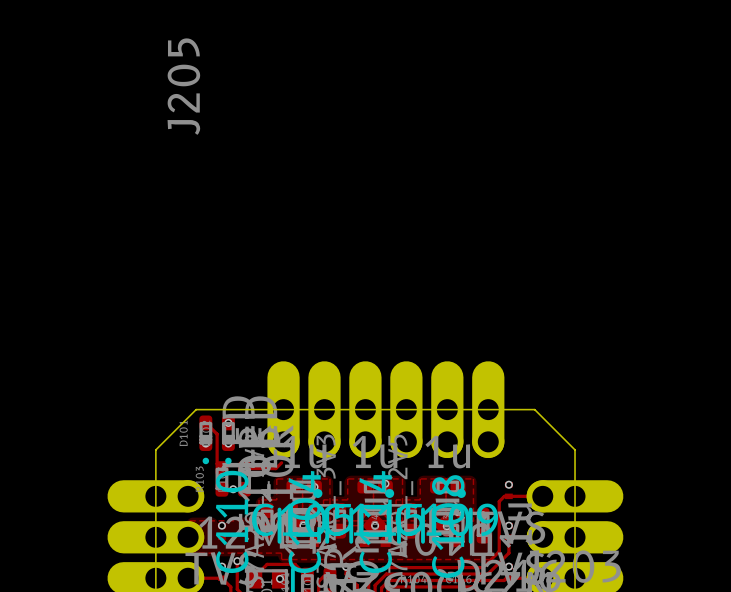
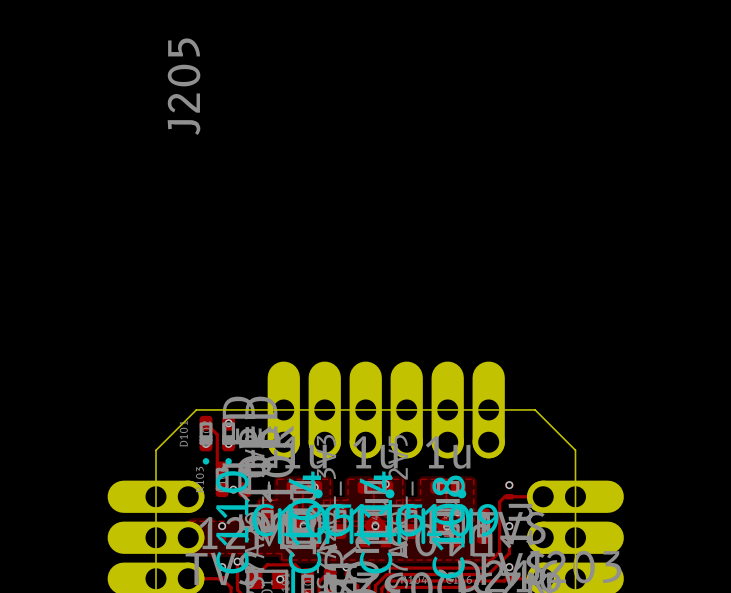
track: (281, 462) (275, 468) (244, 468) -> none

